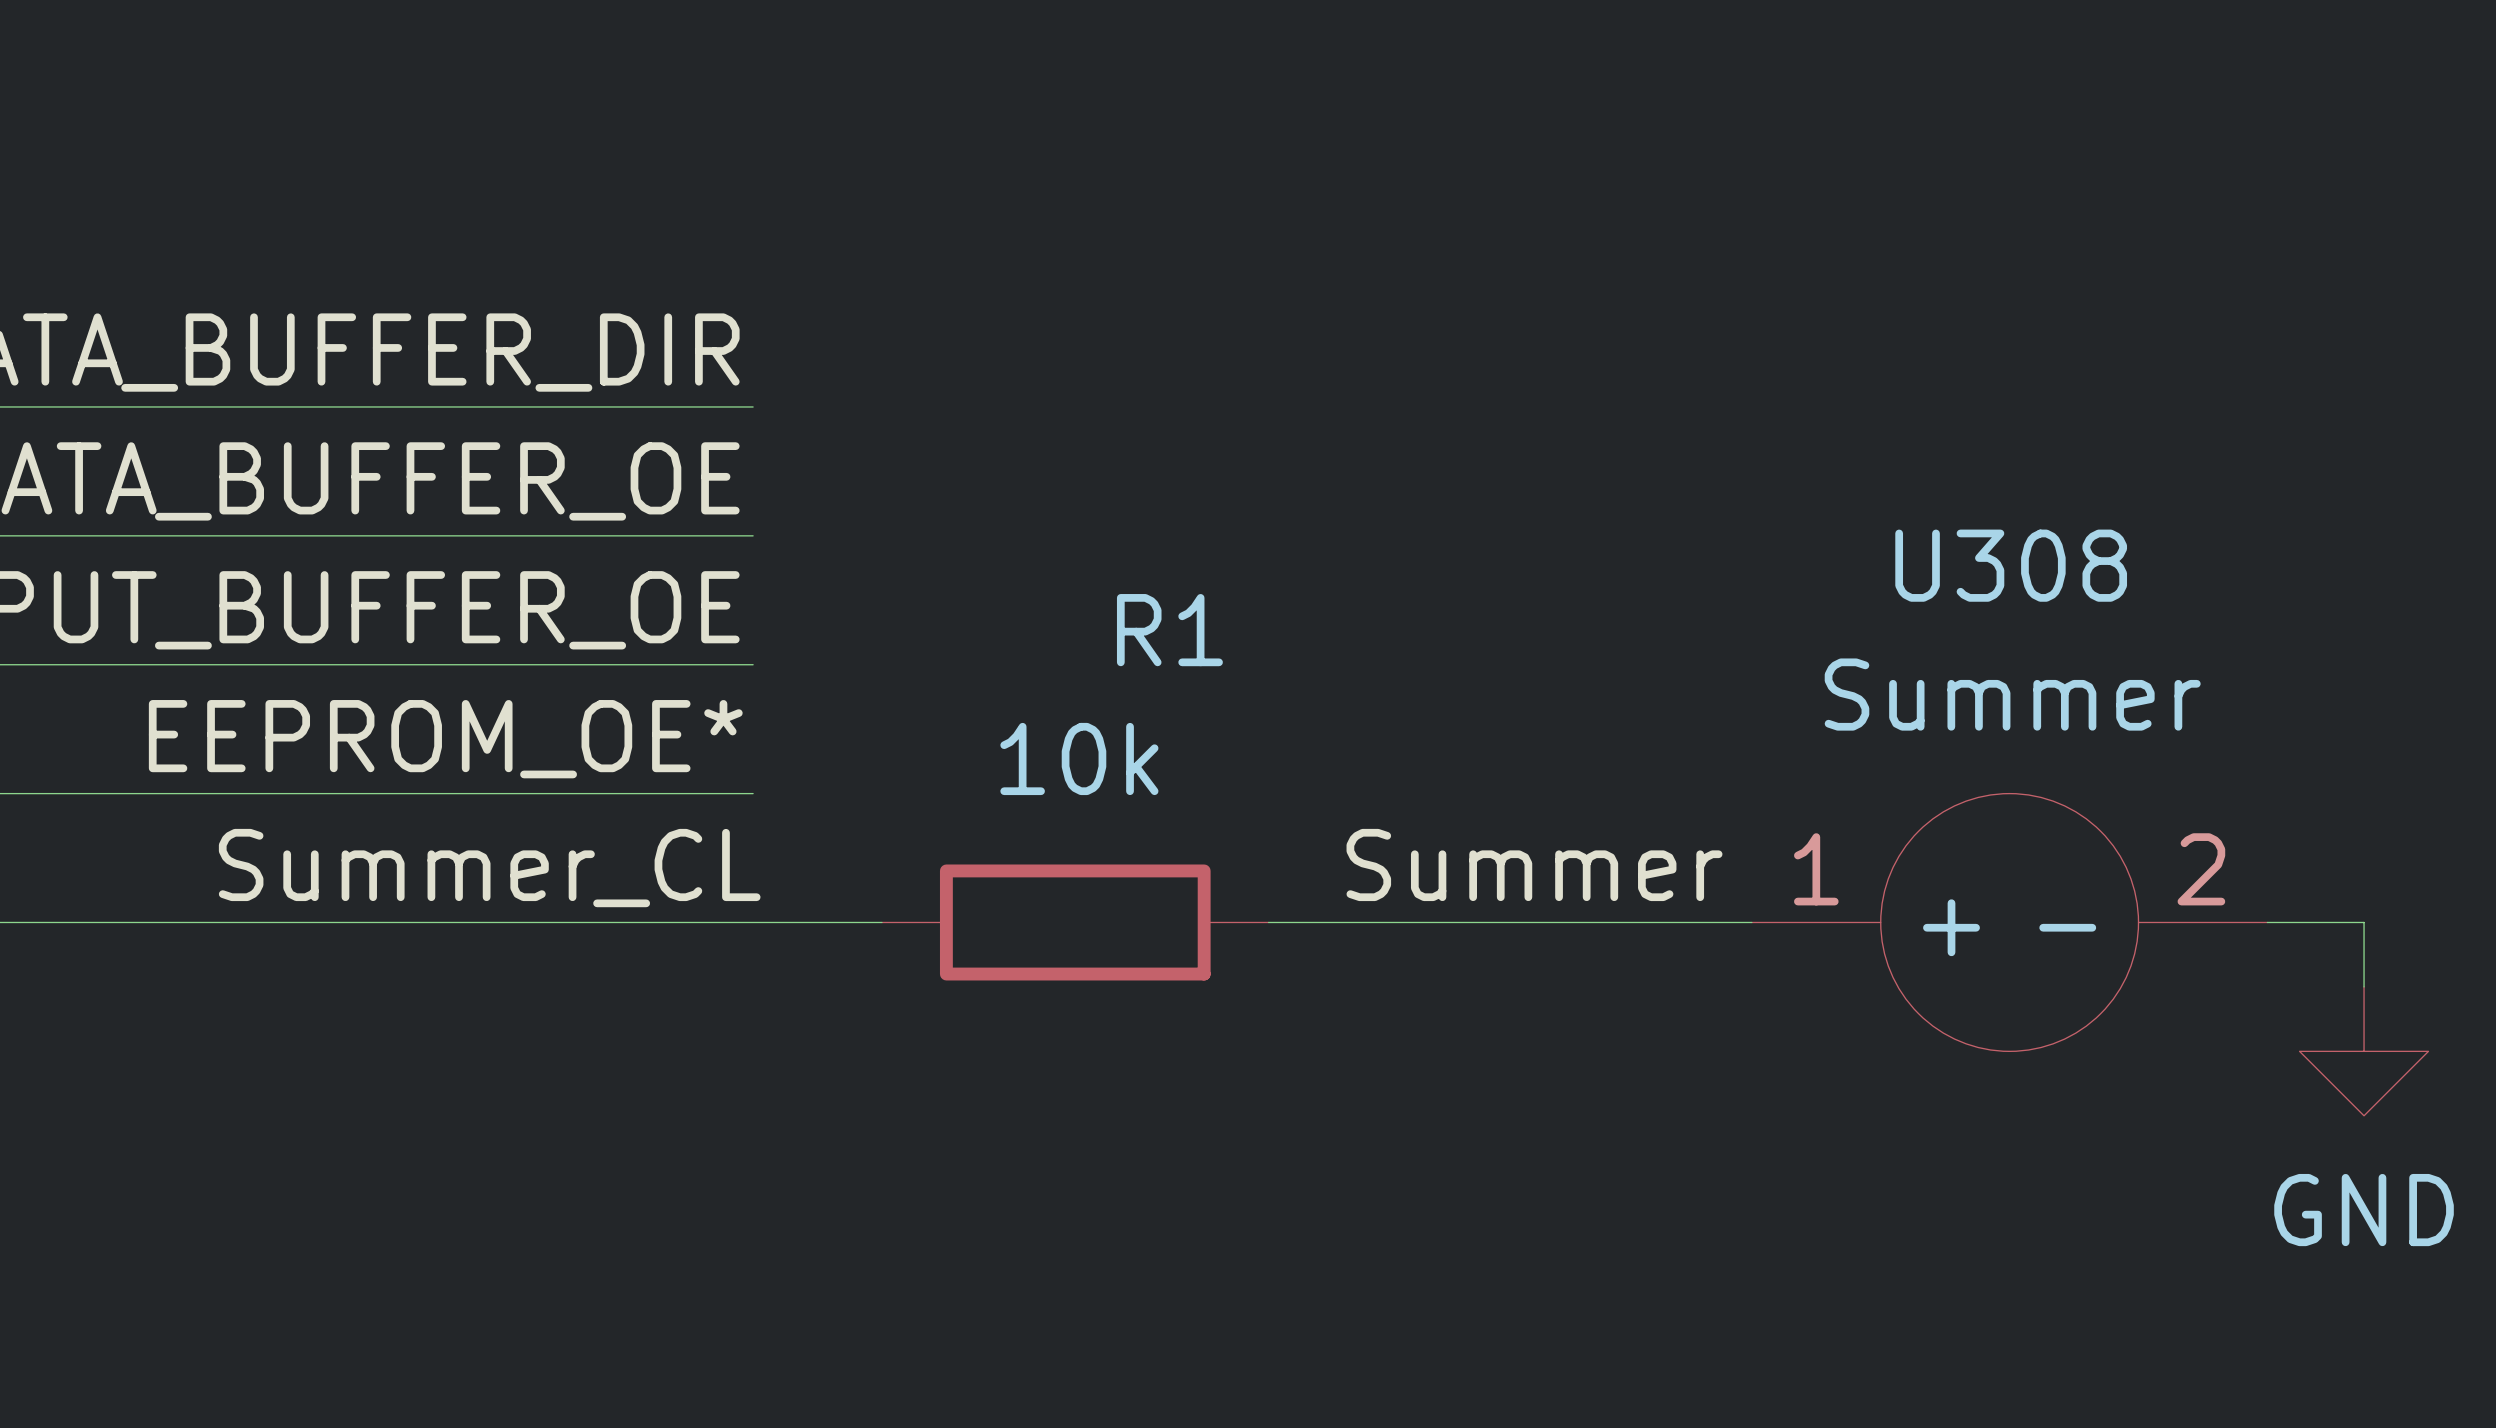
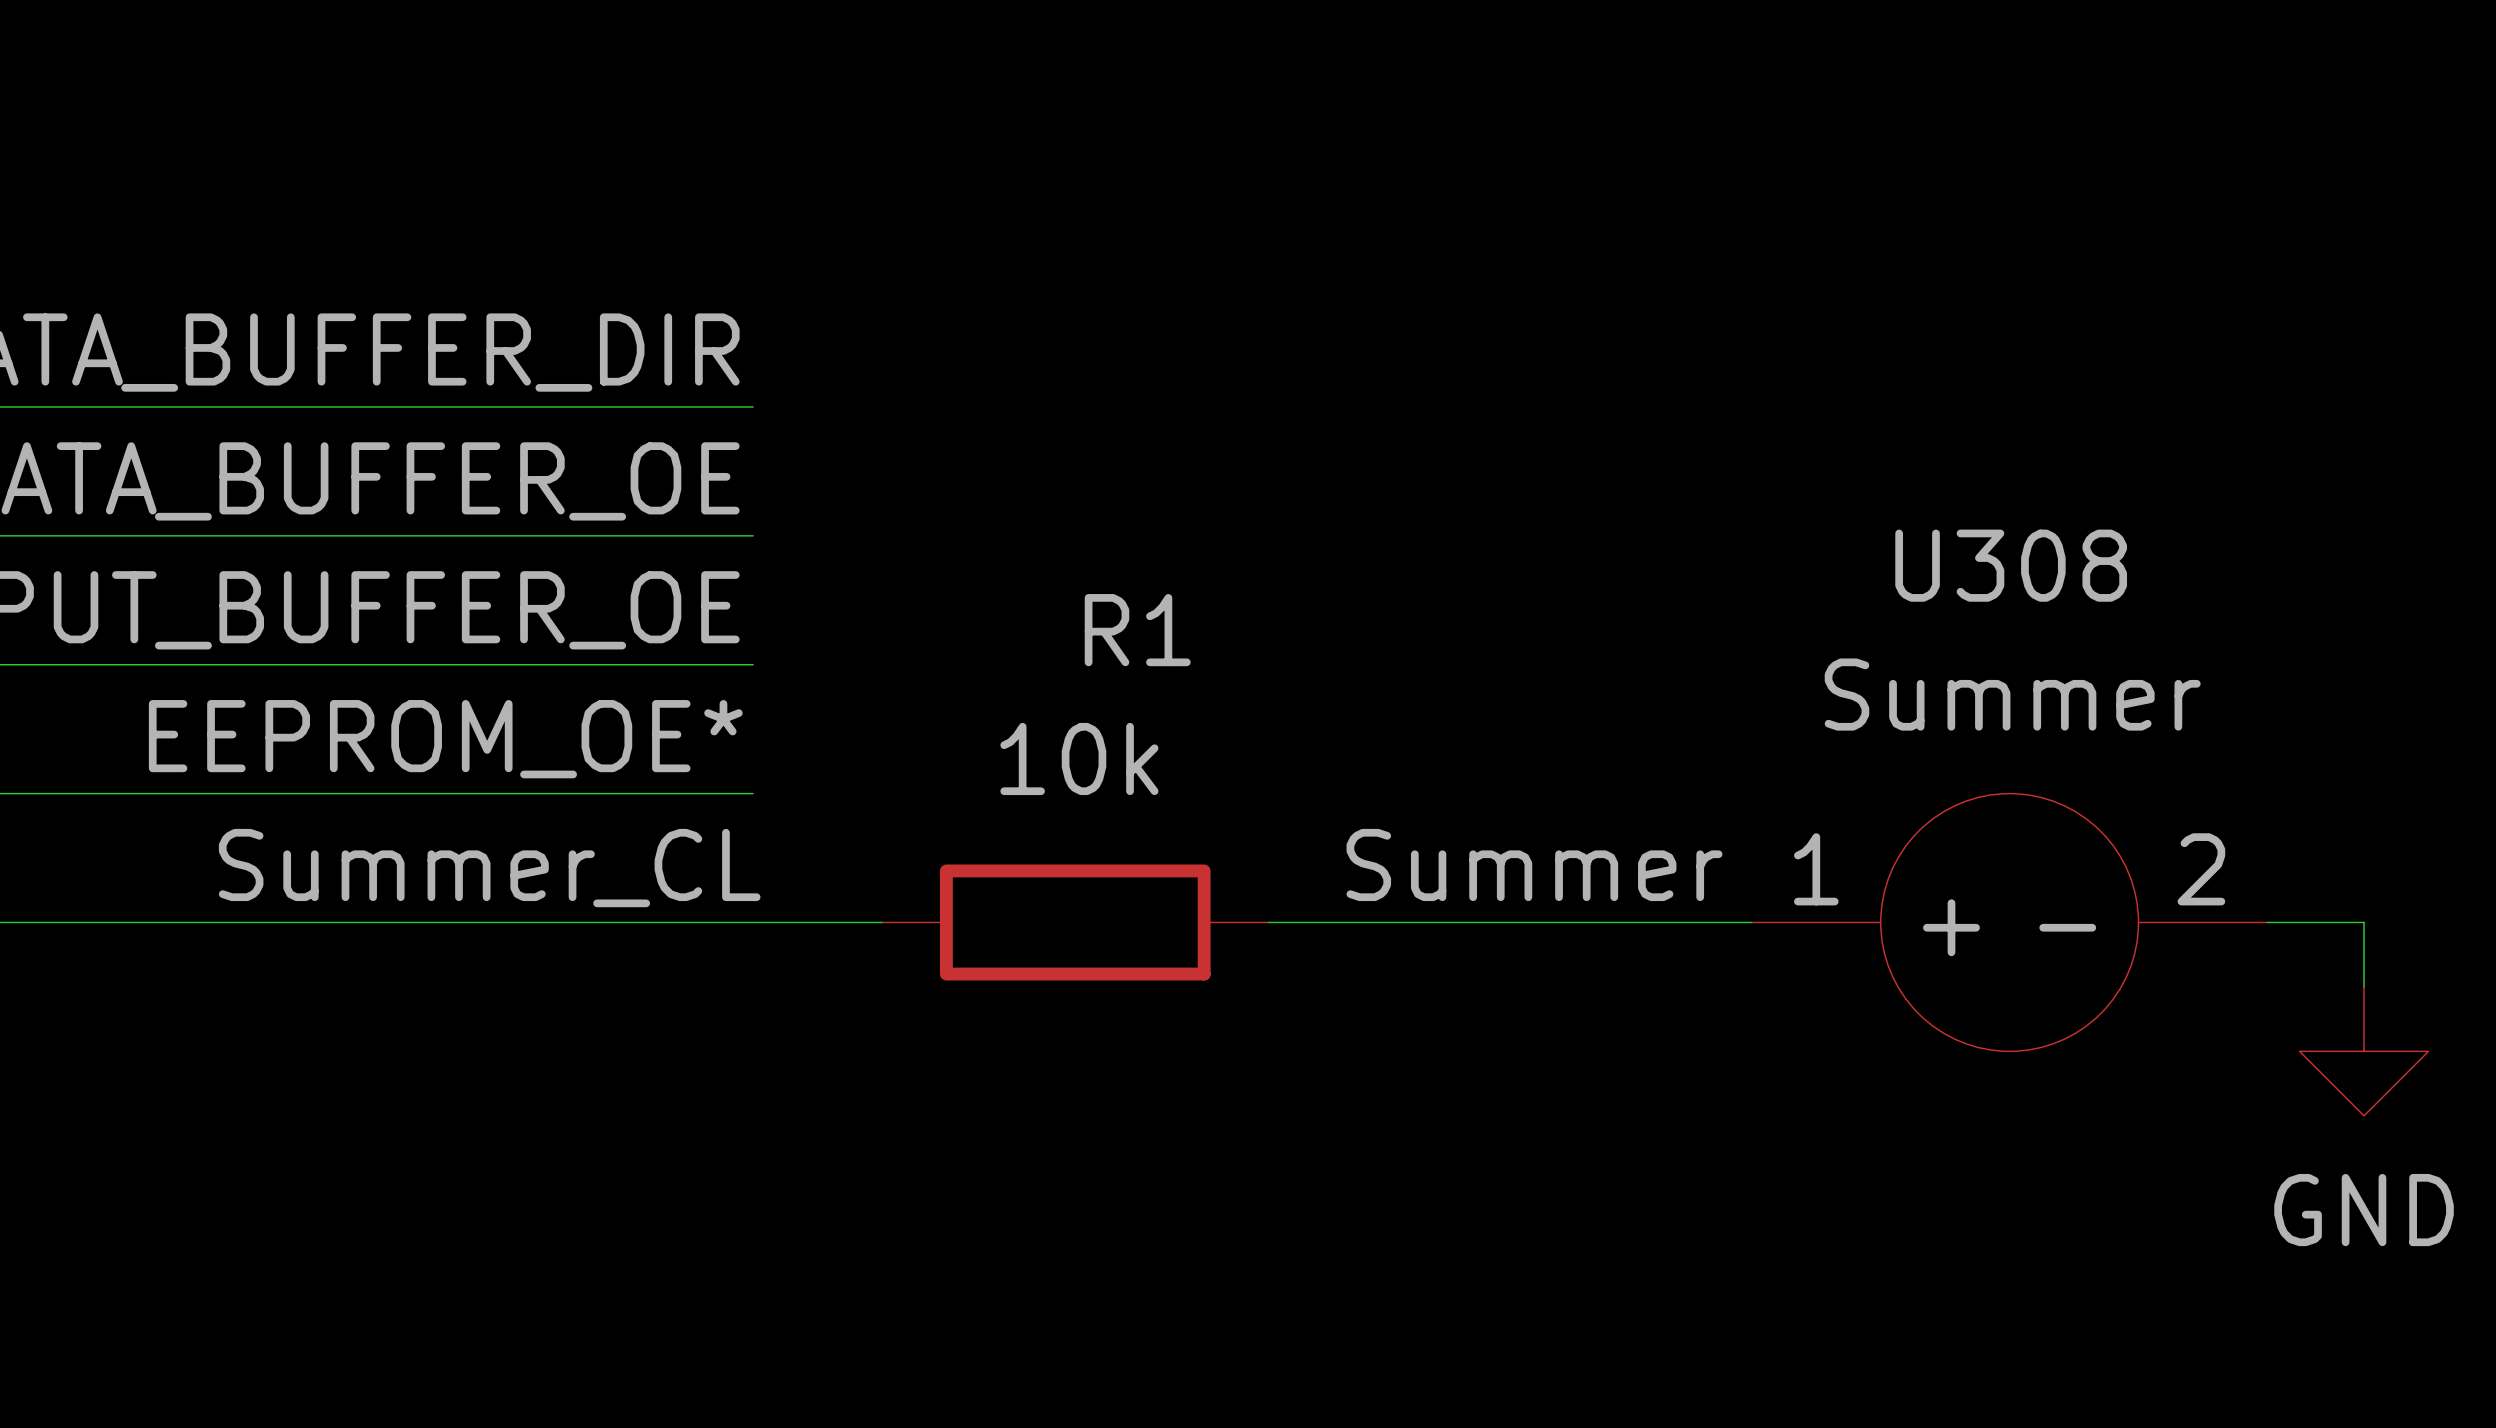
R1 name position: R1 (1169, 630) -> R1 (1137, 630)

